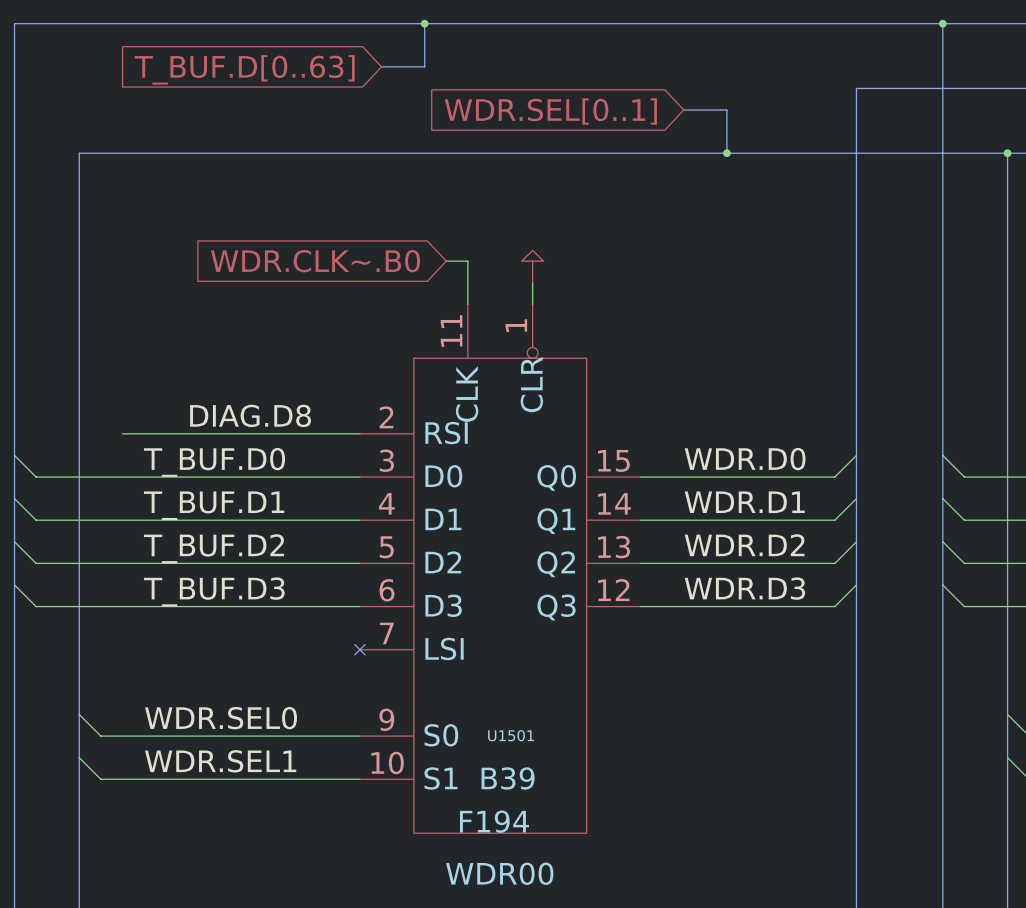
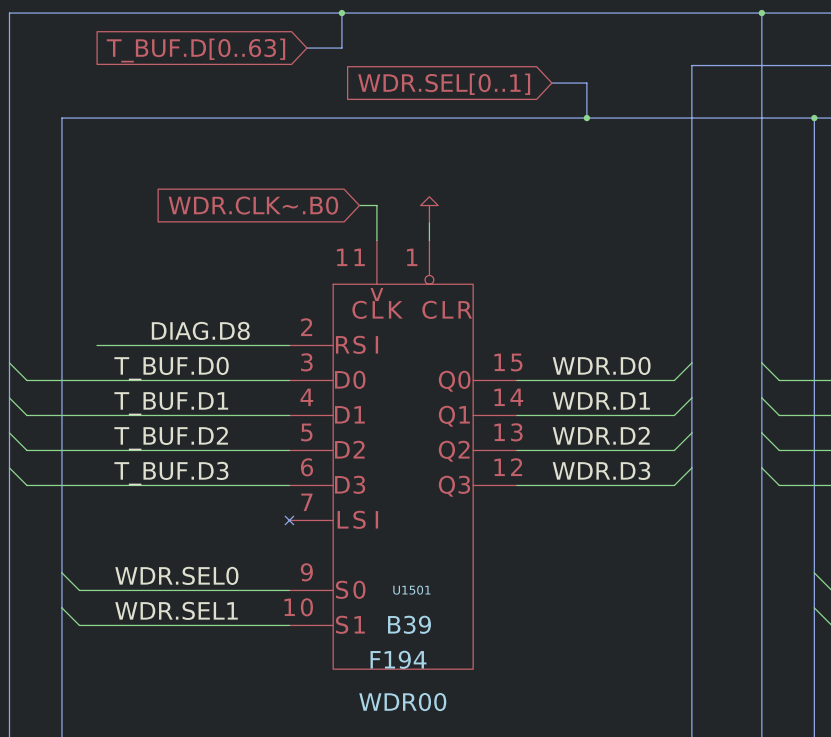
U1501 symbol: [359, 304, 641, 834] -> [289, 240, 517, 670]

